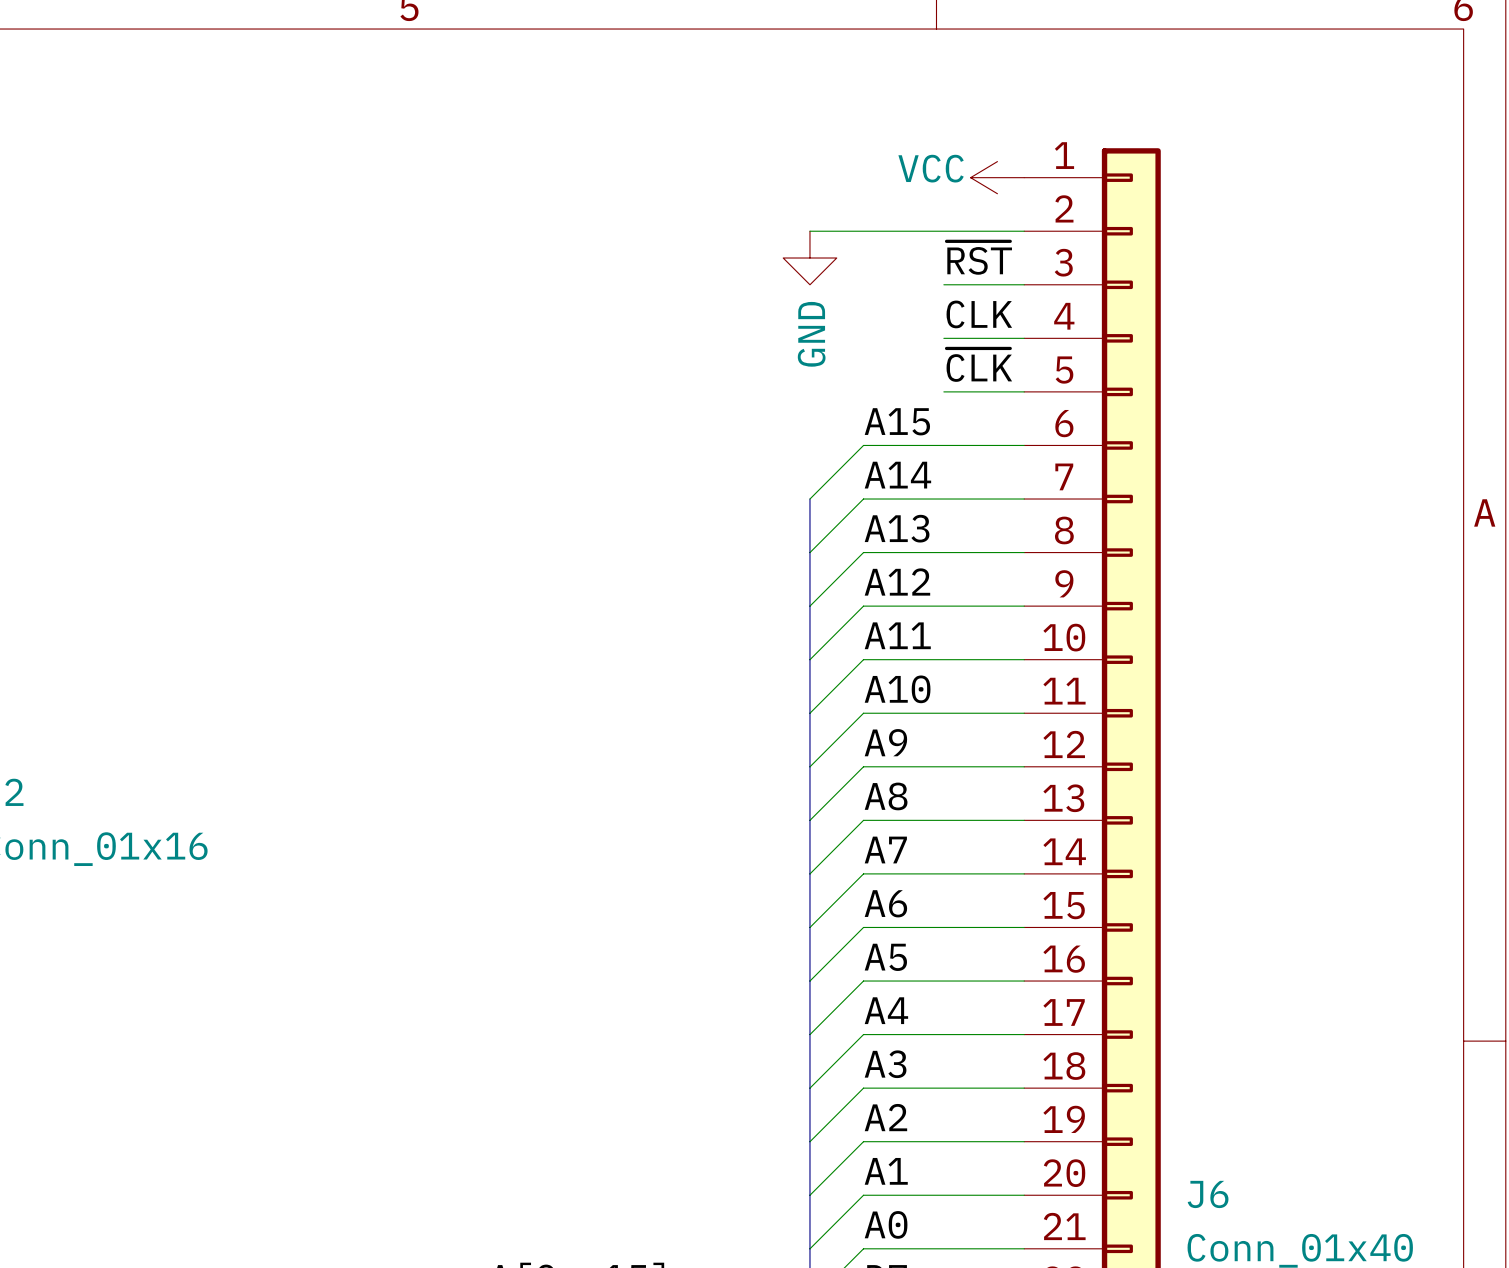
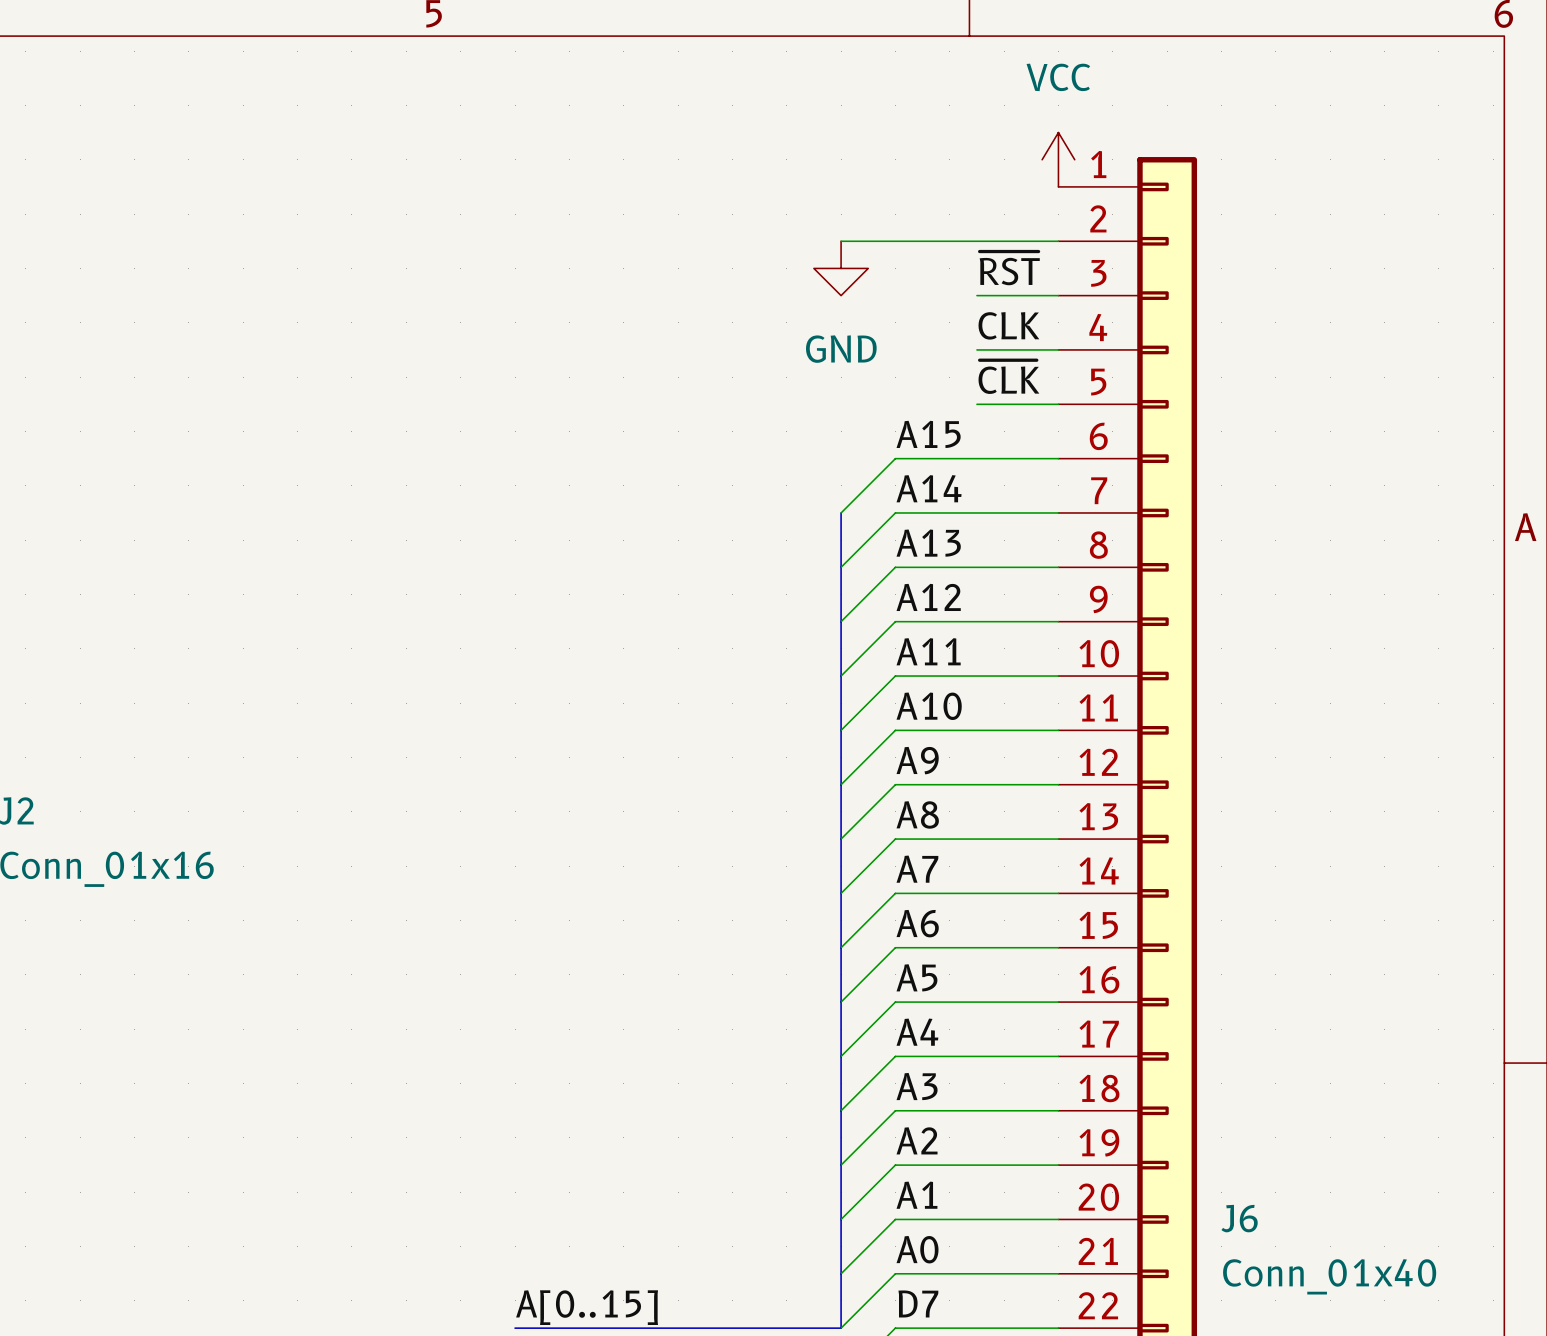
power symbol rotation: 0° (997, 177) -> 90° clockwise (1058, 159)
power symbol position: VCC (997, 177) -> VCC (1058, 159)
power symbol text rotation: 0° (811, 334) -> 90° clockwise (841, 349)

